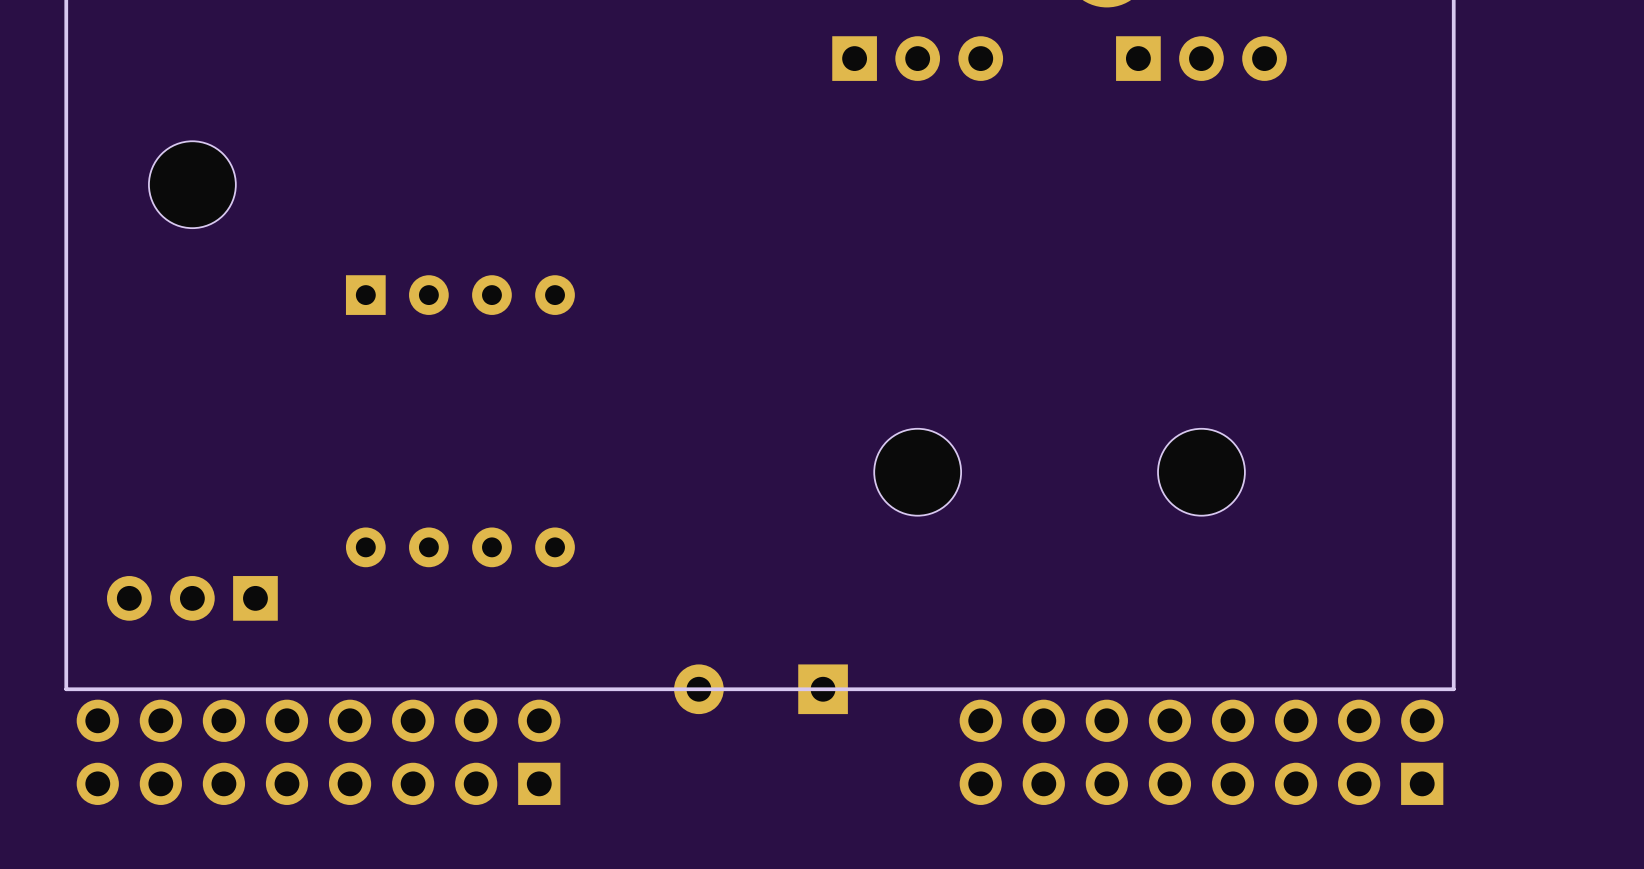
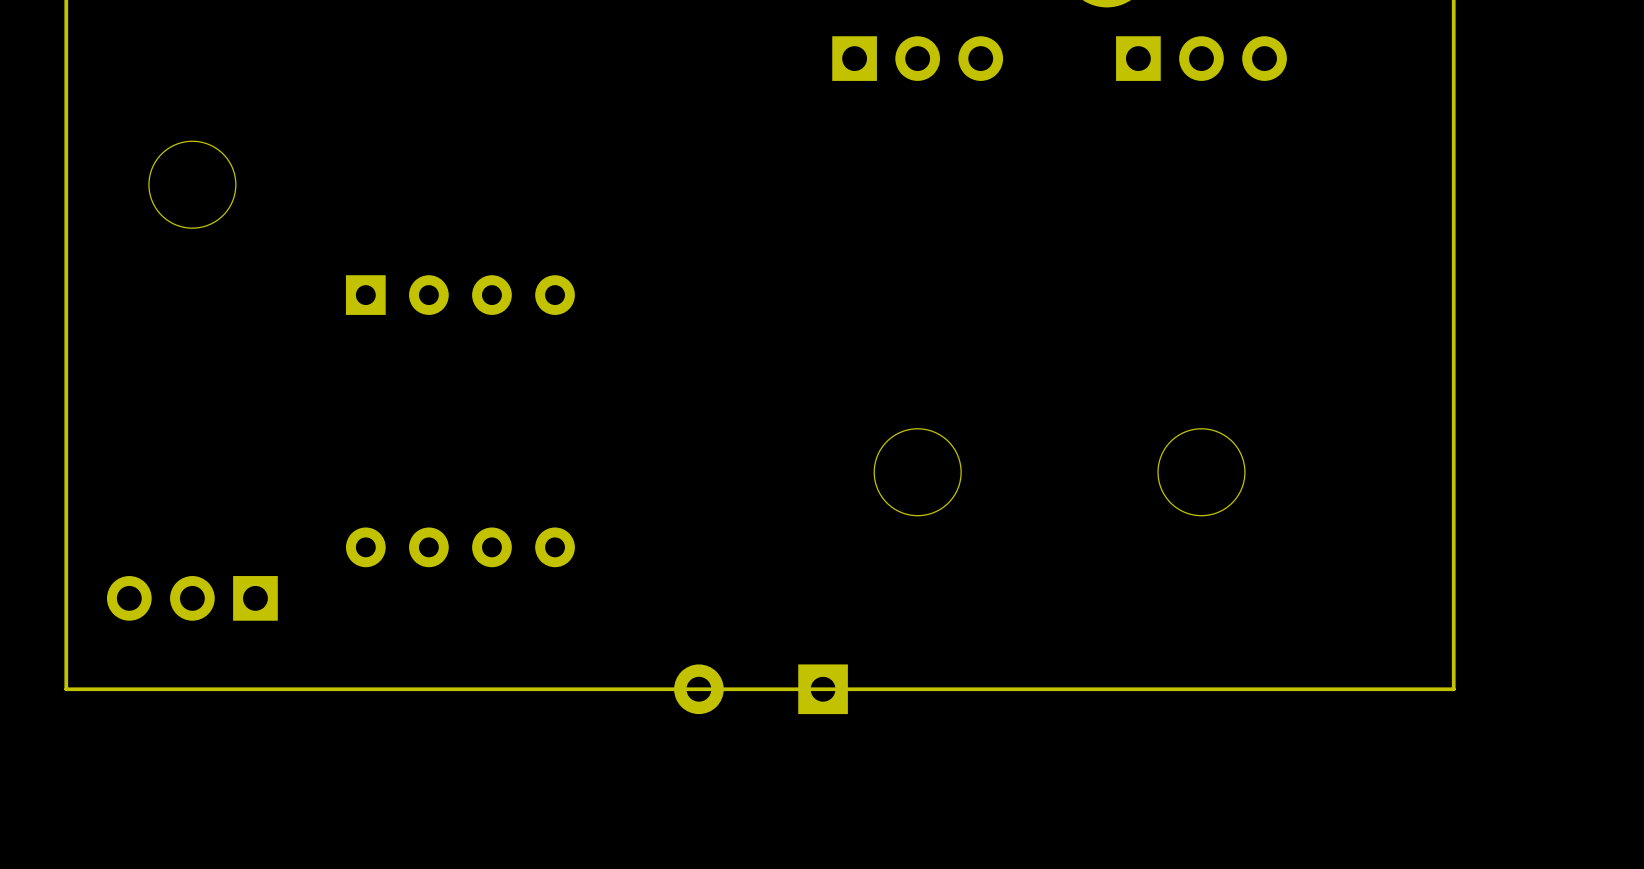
part: (318, 752) -> none
part: (1201, 752) -> none

